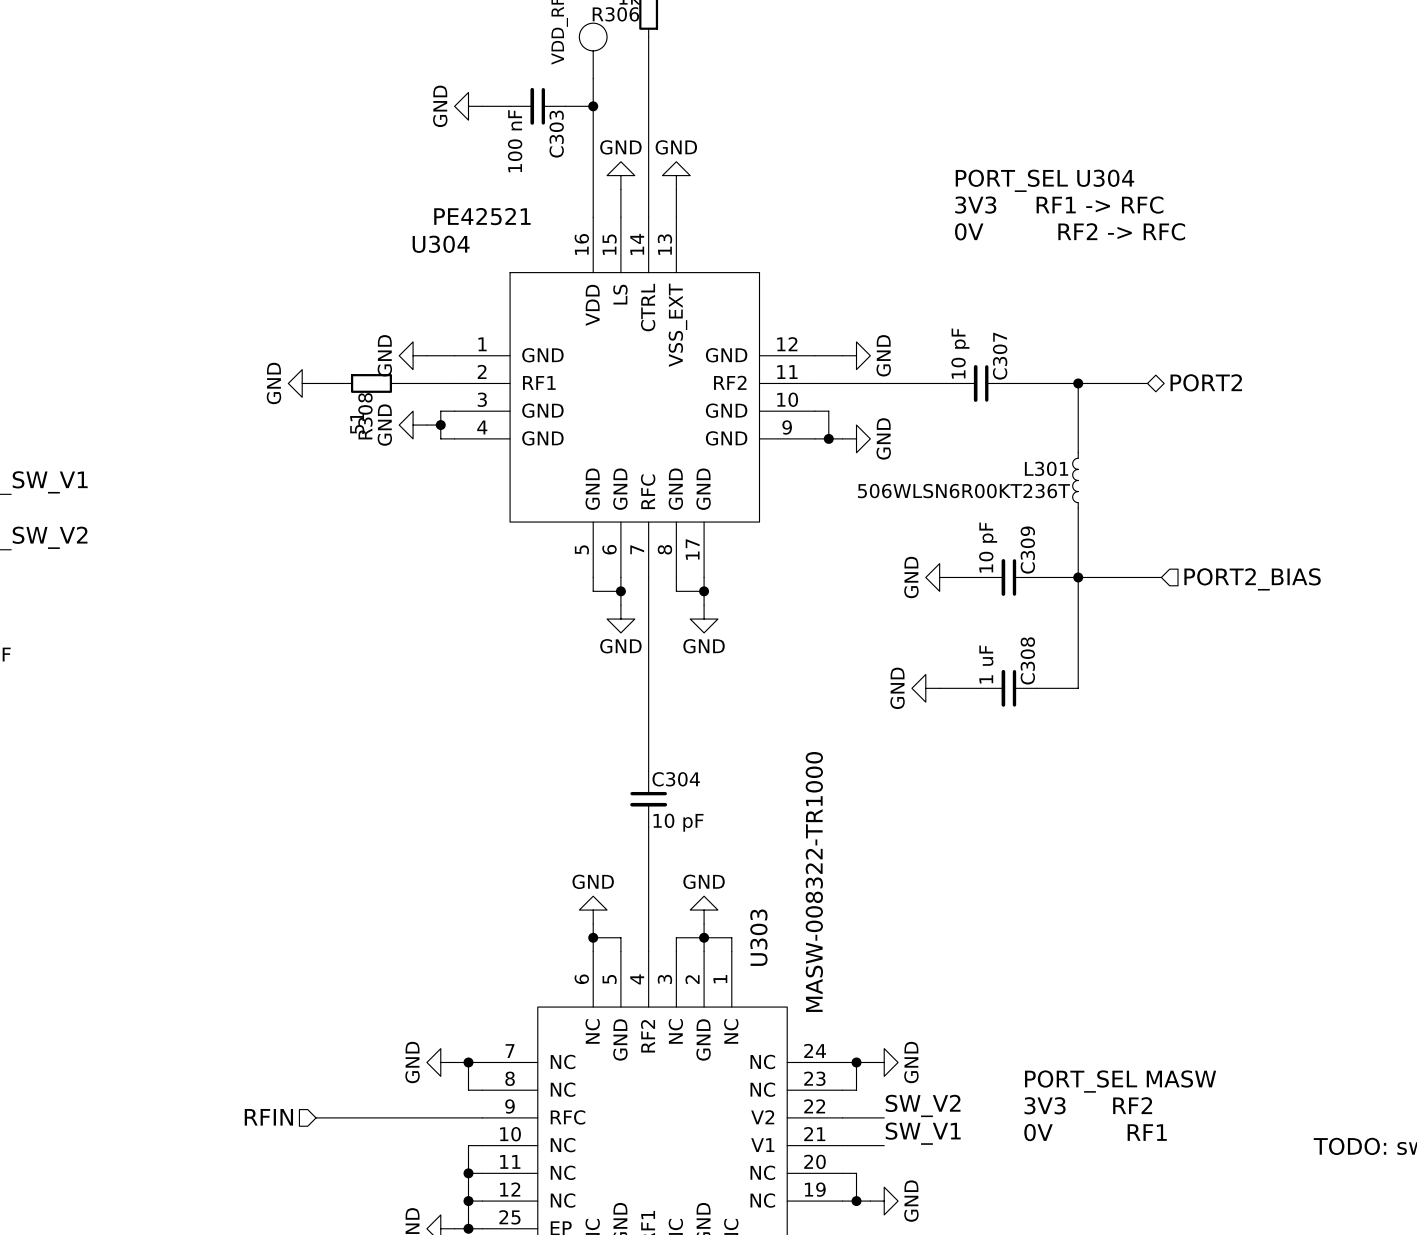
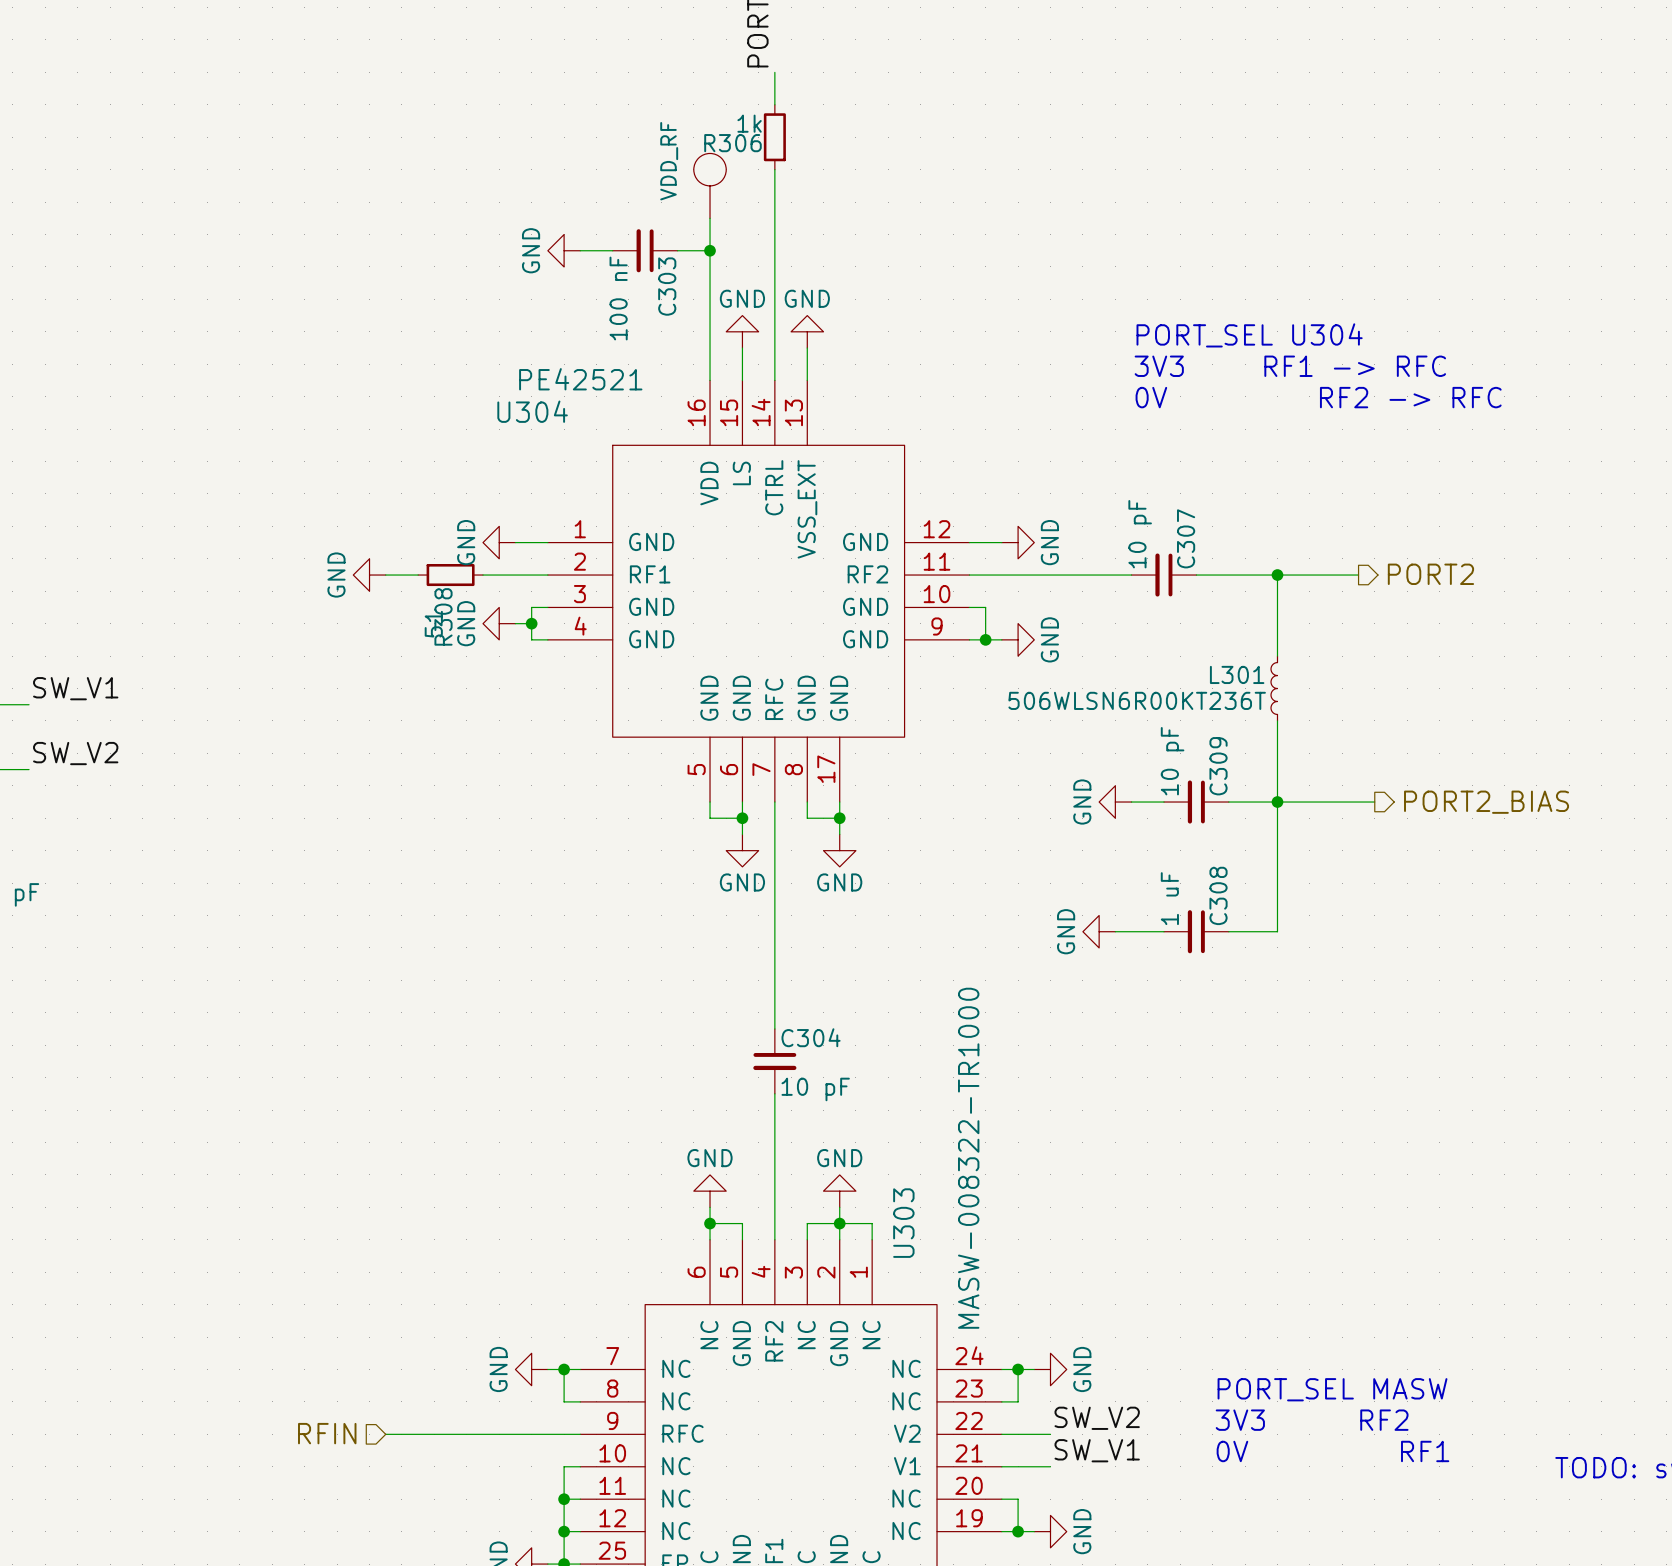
hierarchical label shape: bidirectional (1206, 382) -> output (1430, 574)
hierarchical label shape: input (1252, 579) -> output (1486, 802)

